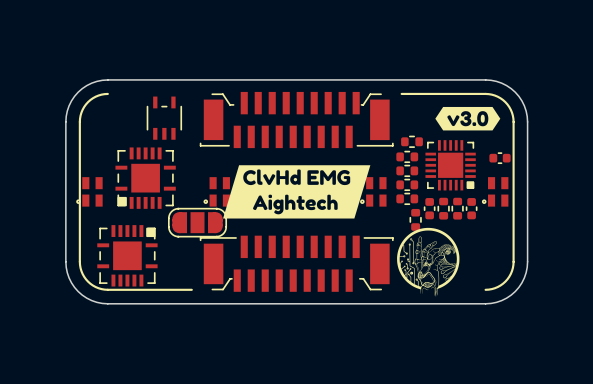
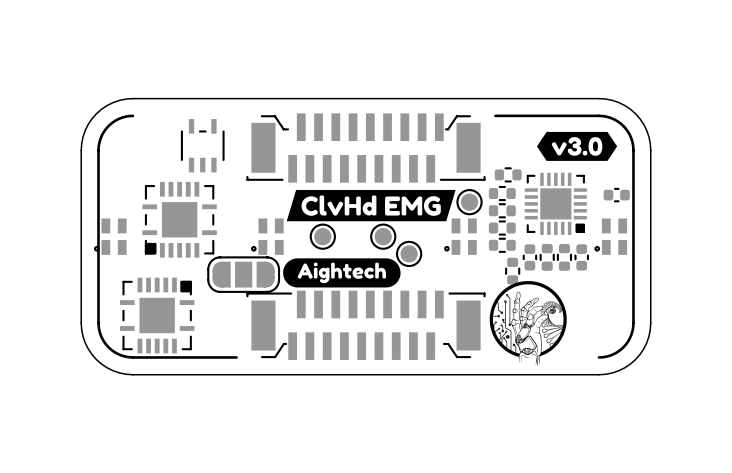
drawing: none -> [286, 189, 456, 222]
part: none -> (469, 202)
drawing: [223, 165, 371, 219] -> none
part: none -> (322, 236)
part: none -> (383, 236)
part: none -> (409, 253)
drawing: none -> [283, 258, 401, 288]

